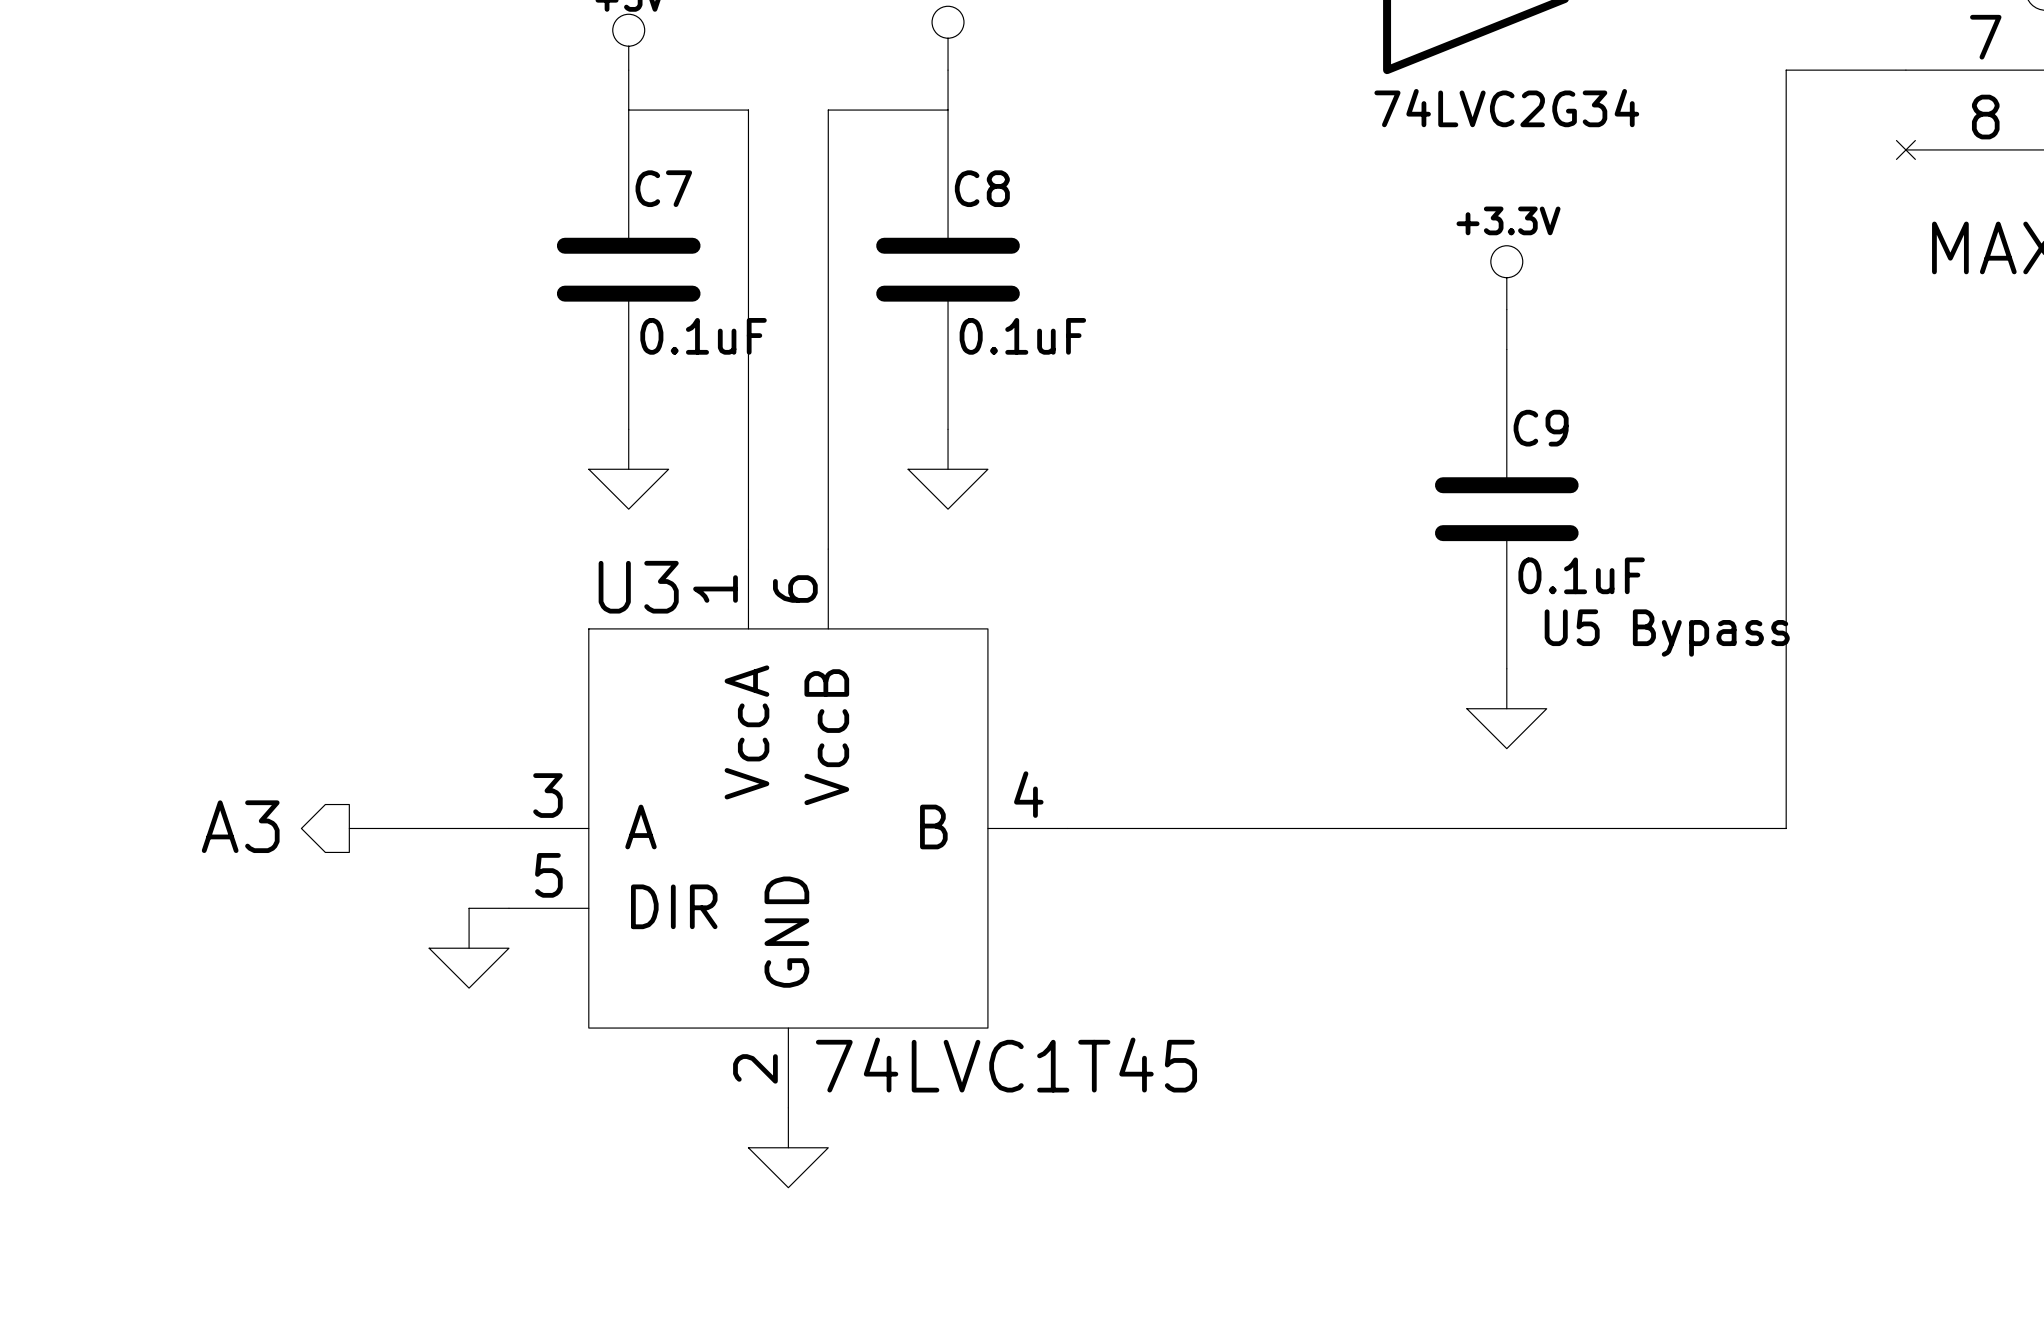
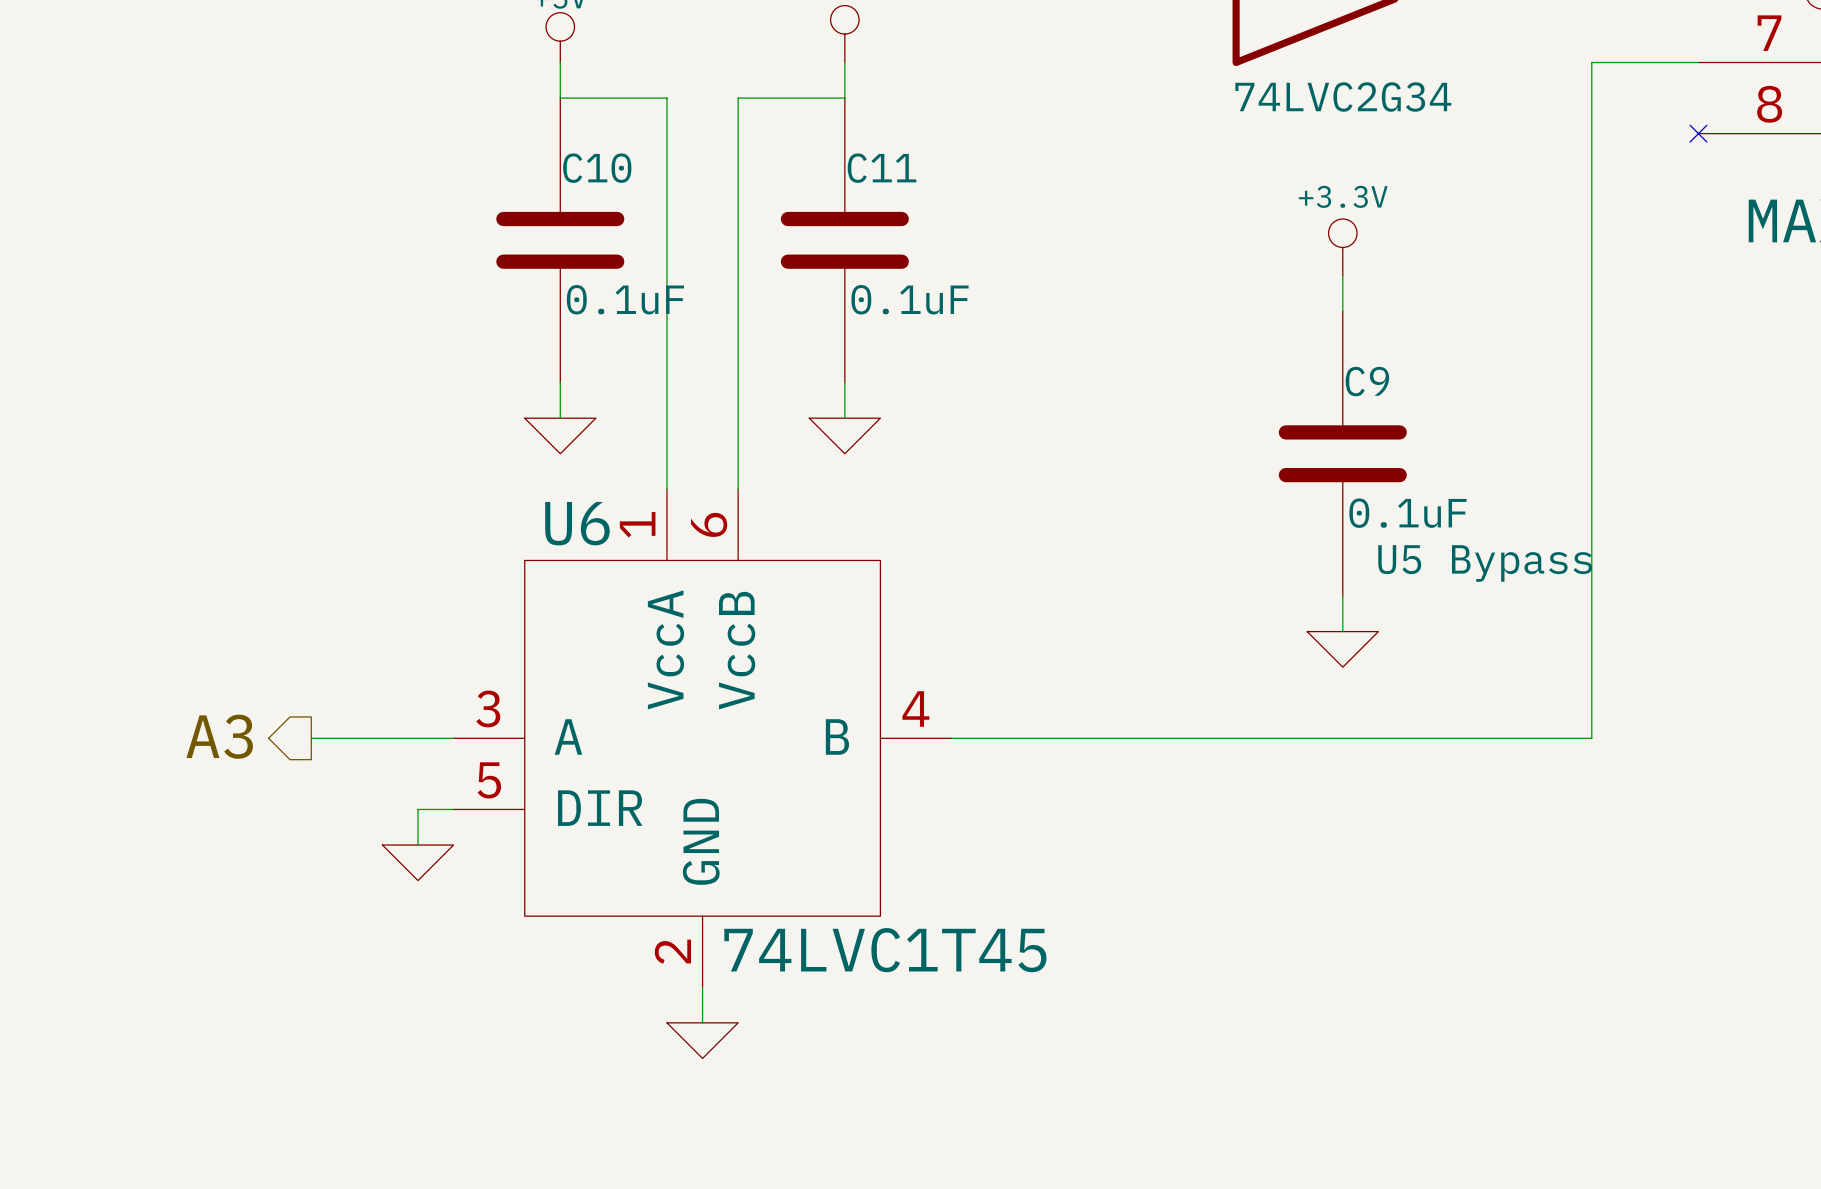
C7 name: C7 (663, 188) -> C10 (597, 168)
C8 name: C8 (982, 188) -> C11 (882, 168)
U3 name: U3 (638, 587) -> U6 (577, 523)

